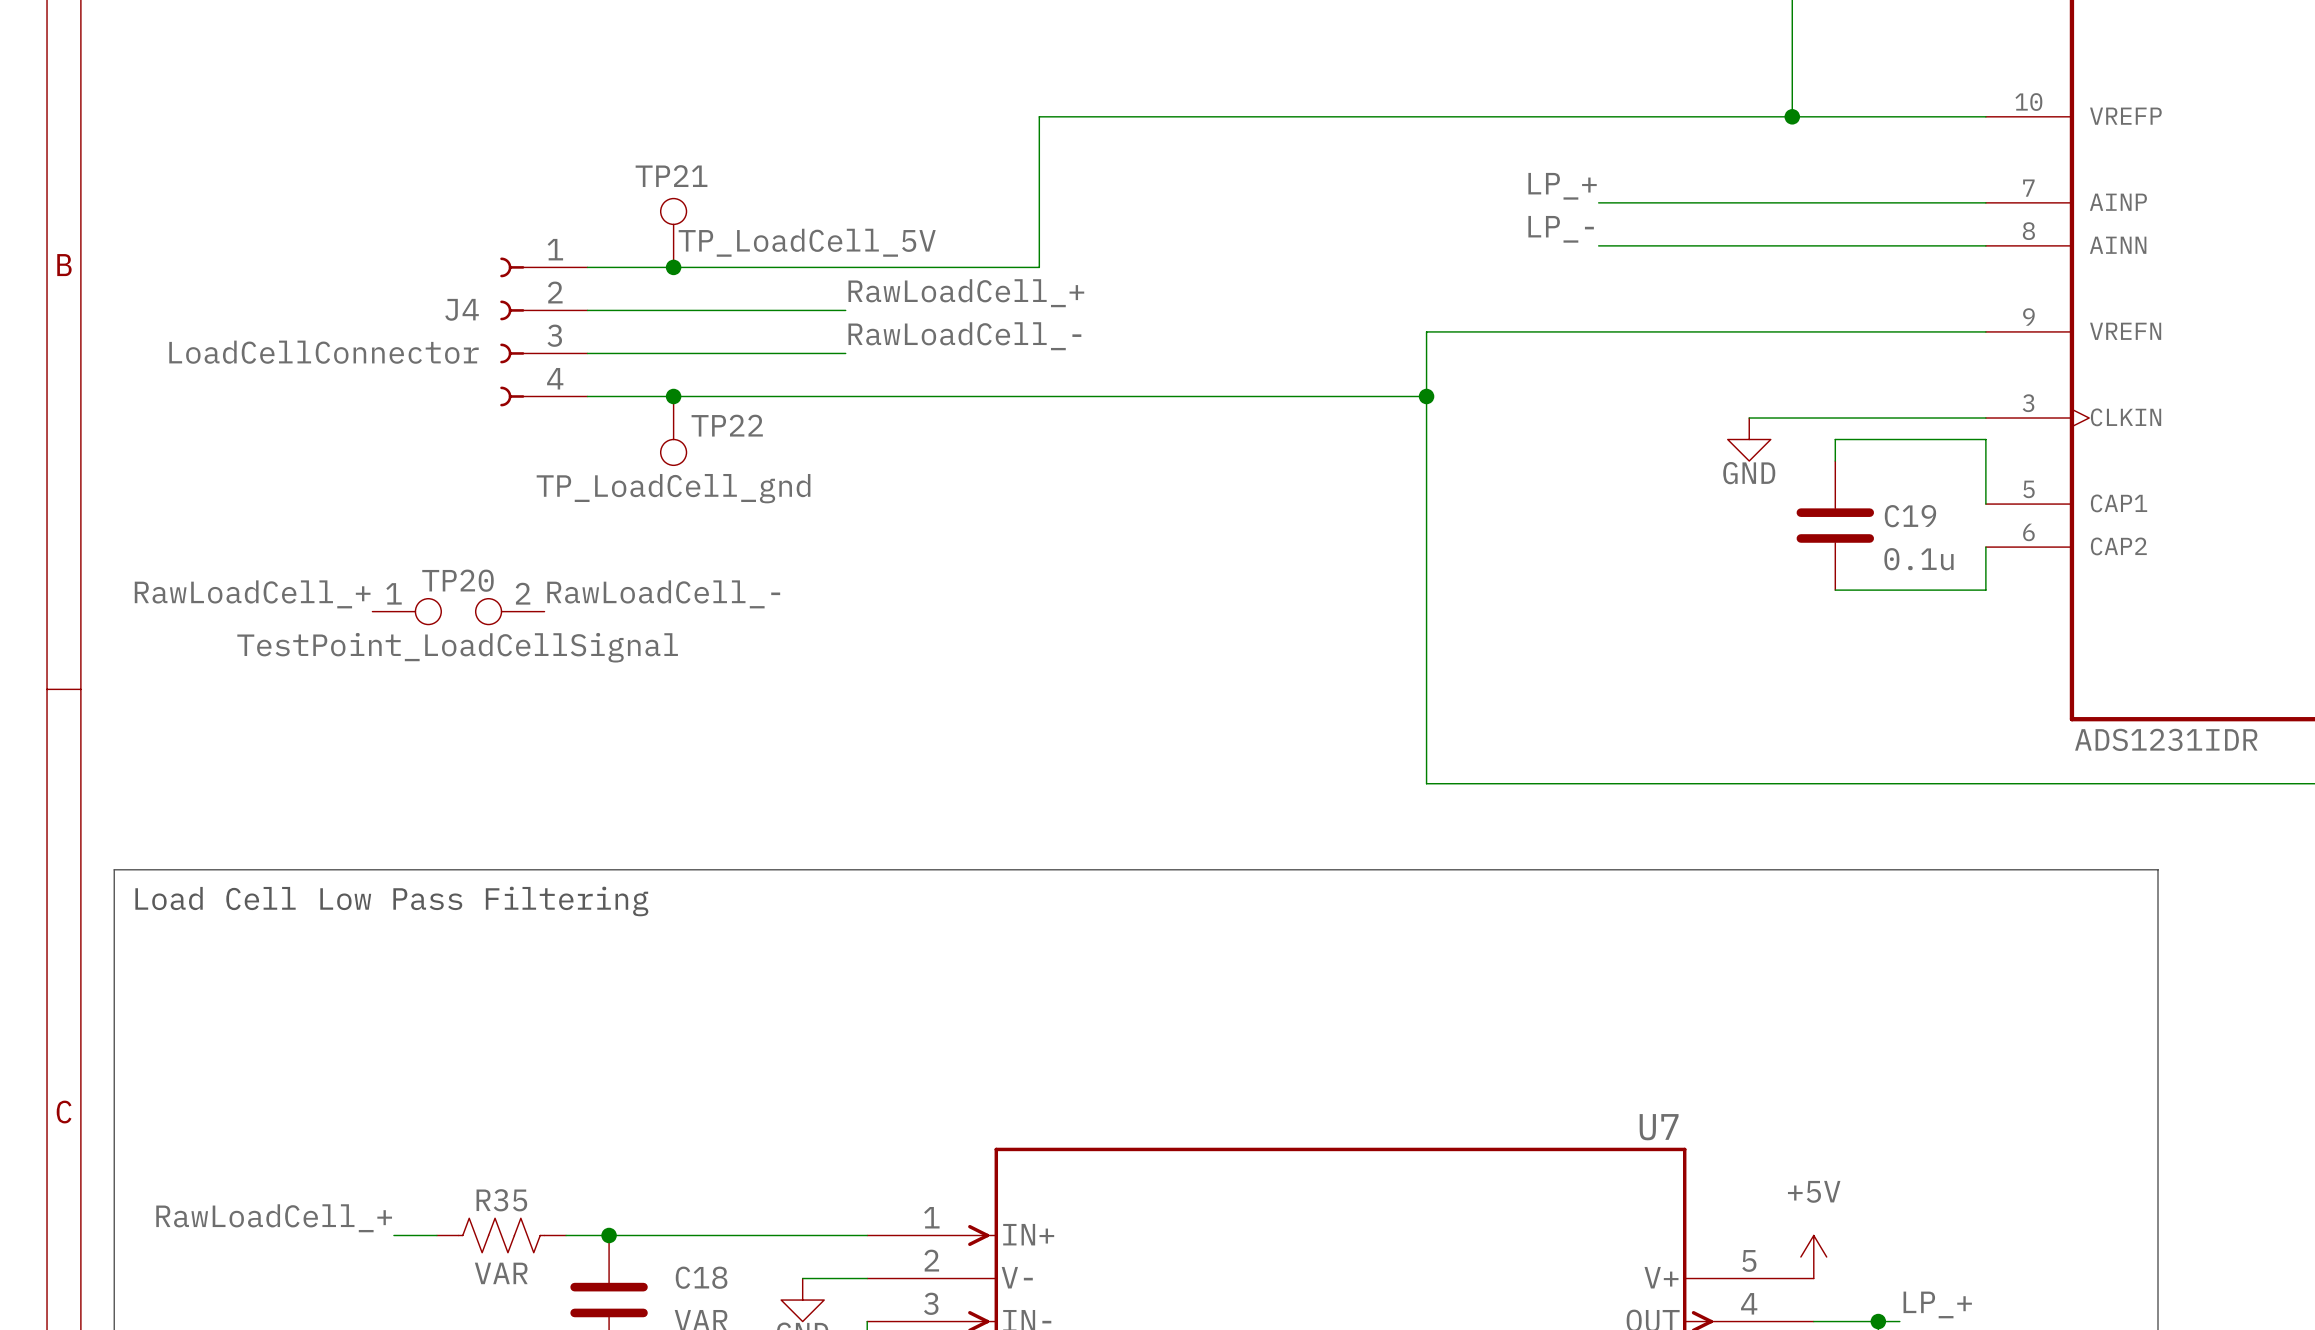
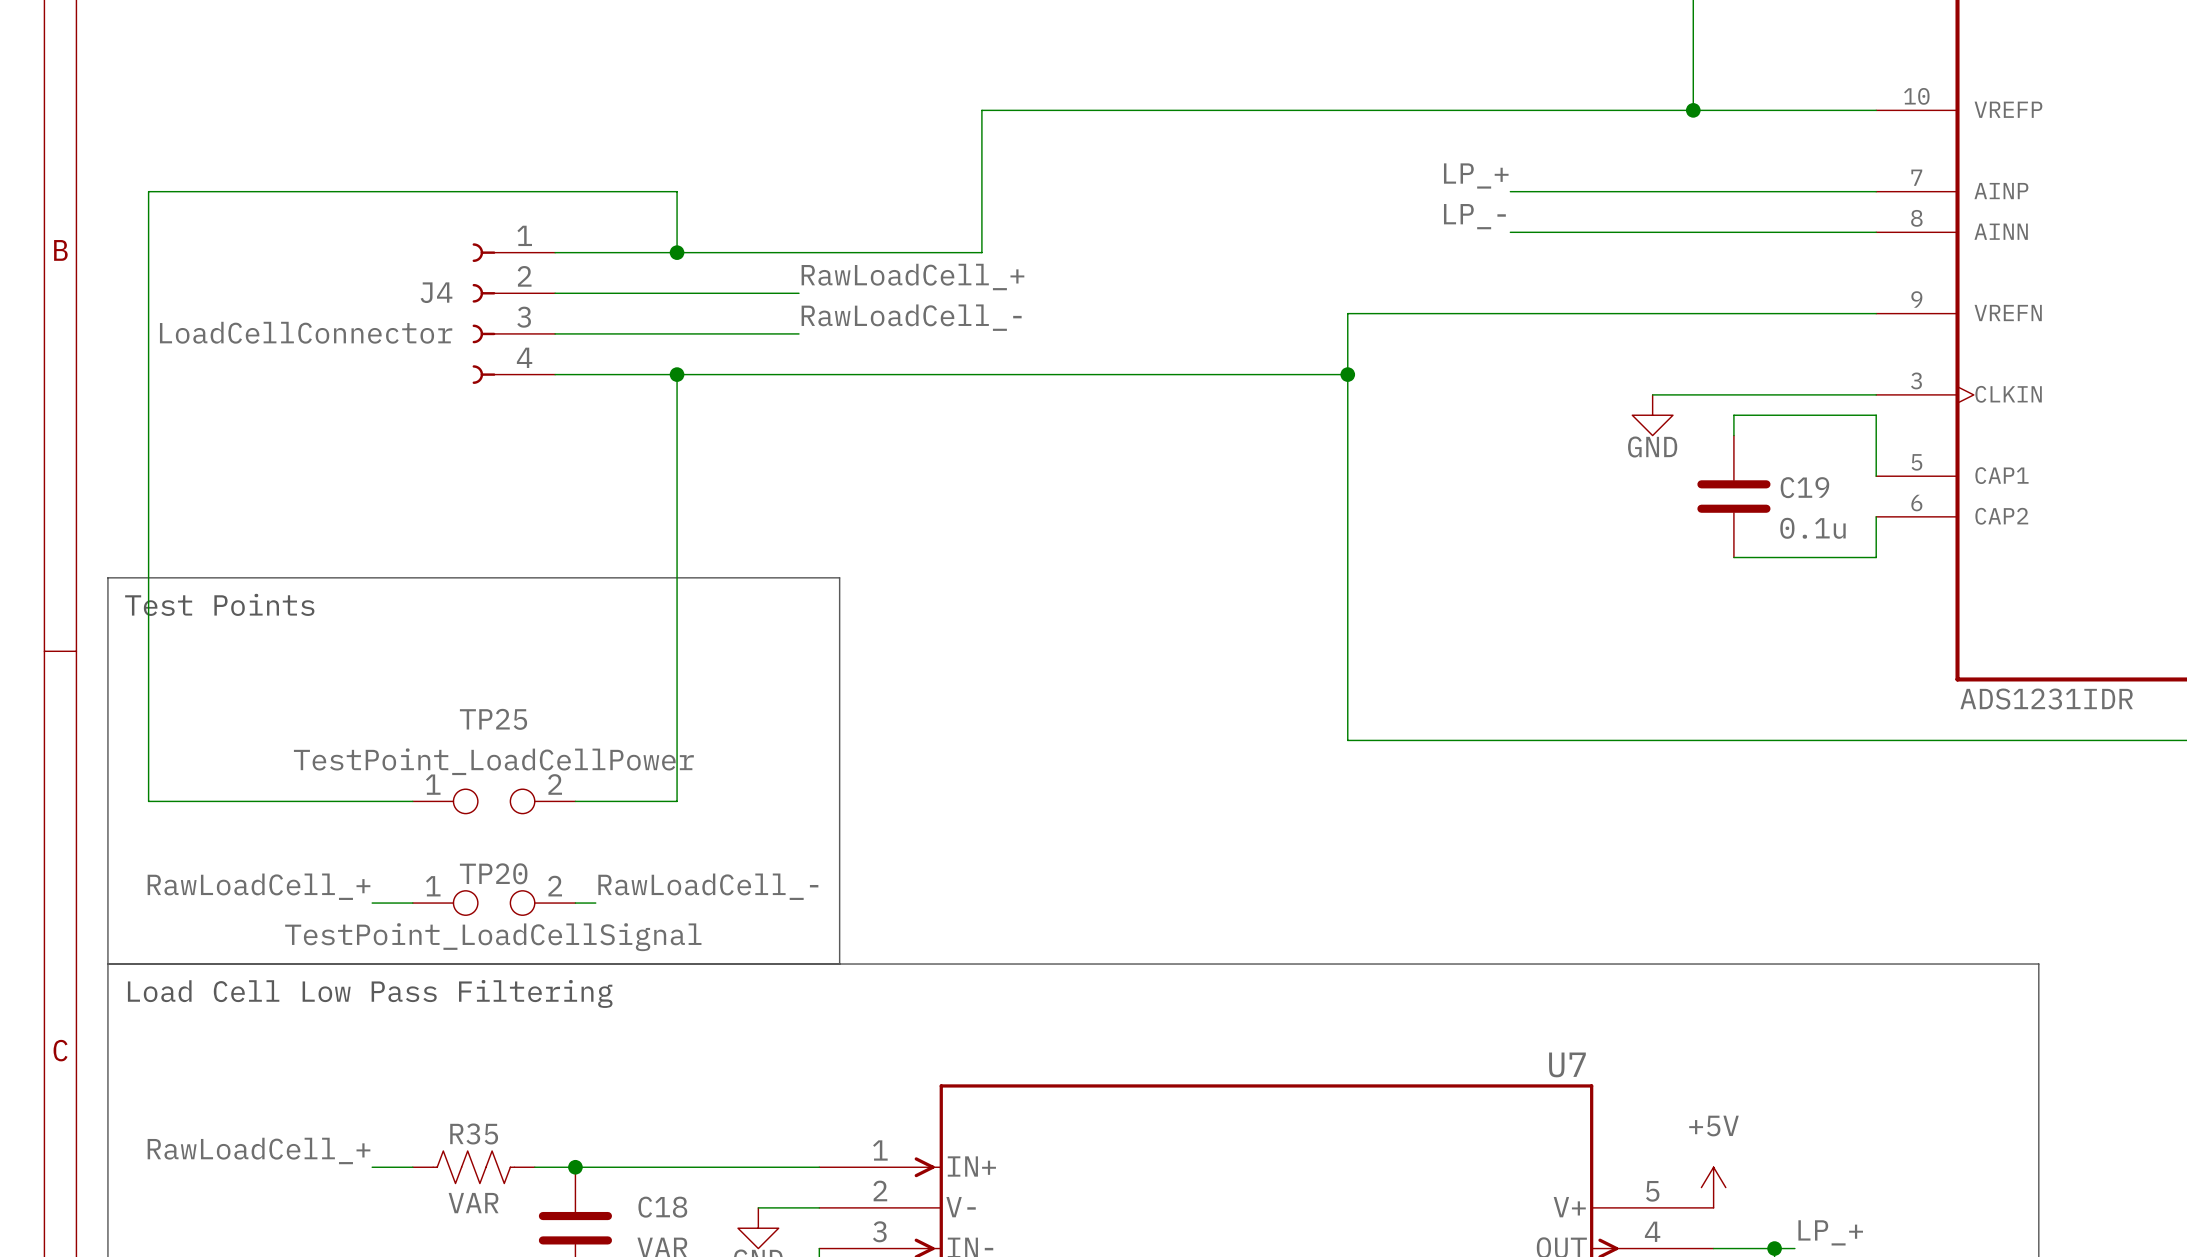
TP21: TP_LoadCell_5V (673, 232) -> none
junction position: (673, 267) -> (677, 252)
wire: none -> (677, 252) (677, 191) (148, 191) (148, 801) (412, 801)
junction position: (673, 396) -> (677, 374)
wire: none -> (677, 374) (677, 801) (575, 801)
TP22: TP_LoadCell_gnd (673, 430) -> none
label position: RawLoadCell_+ (252, 594) -> RawLoadCell_+ (259, 886)
label position: RawLoadCell_- (663, 594) -> RawLoadCell_- (708, 886)
TP20 position: (458, 611) -> (494, 903)
text: none -> Test Points (219, 604)
TP25: none -> TestPoint_LoadCellPower (494, 801)
line: (114, 869) (2158, 869) (2158, 1020) -> (107, 964) (2038, 964)
line: none -> (107, 821) (107, 577) (839, 577) (839, 964)
text position: Load Cell Low Pass Filtering (391, 901) -> Load Cell Low Pass Filtering (370, 993)
wire: none -> (372, 903) (412, 903)
wire: none -> (575, 903) (595, 903)

